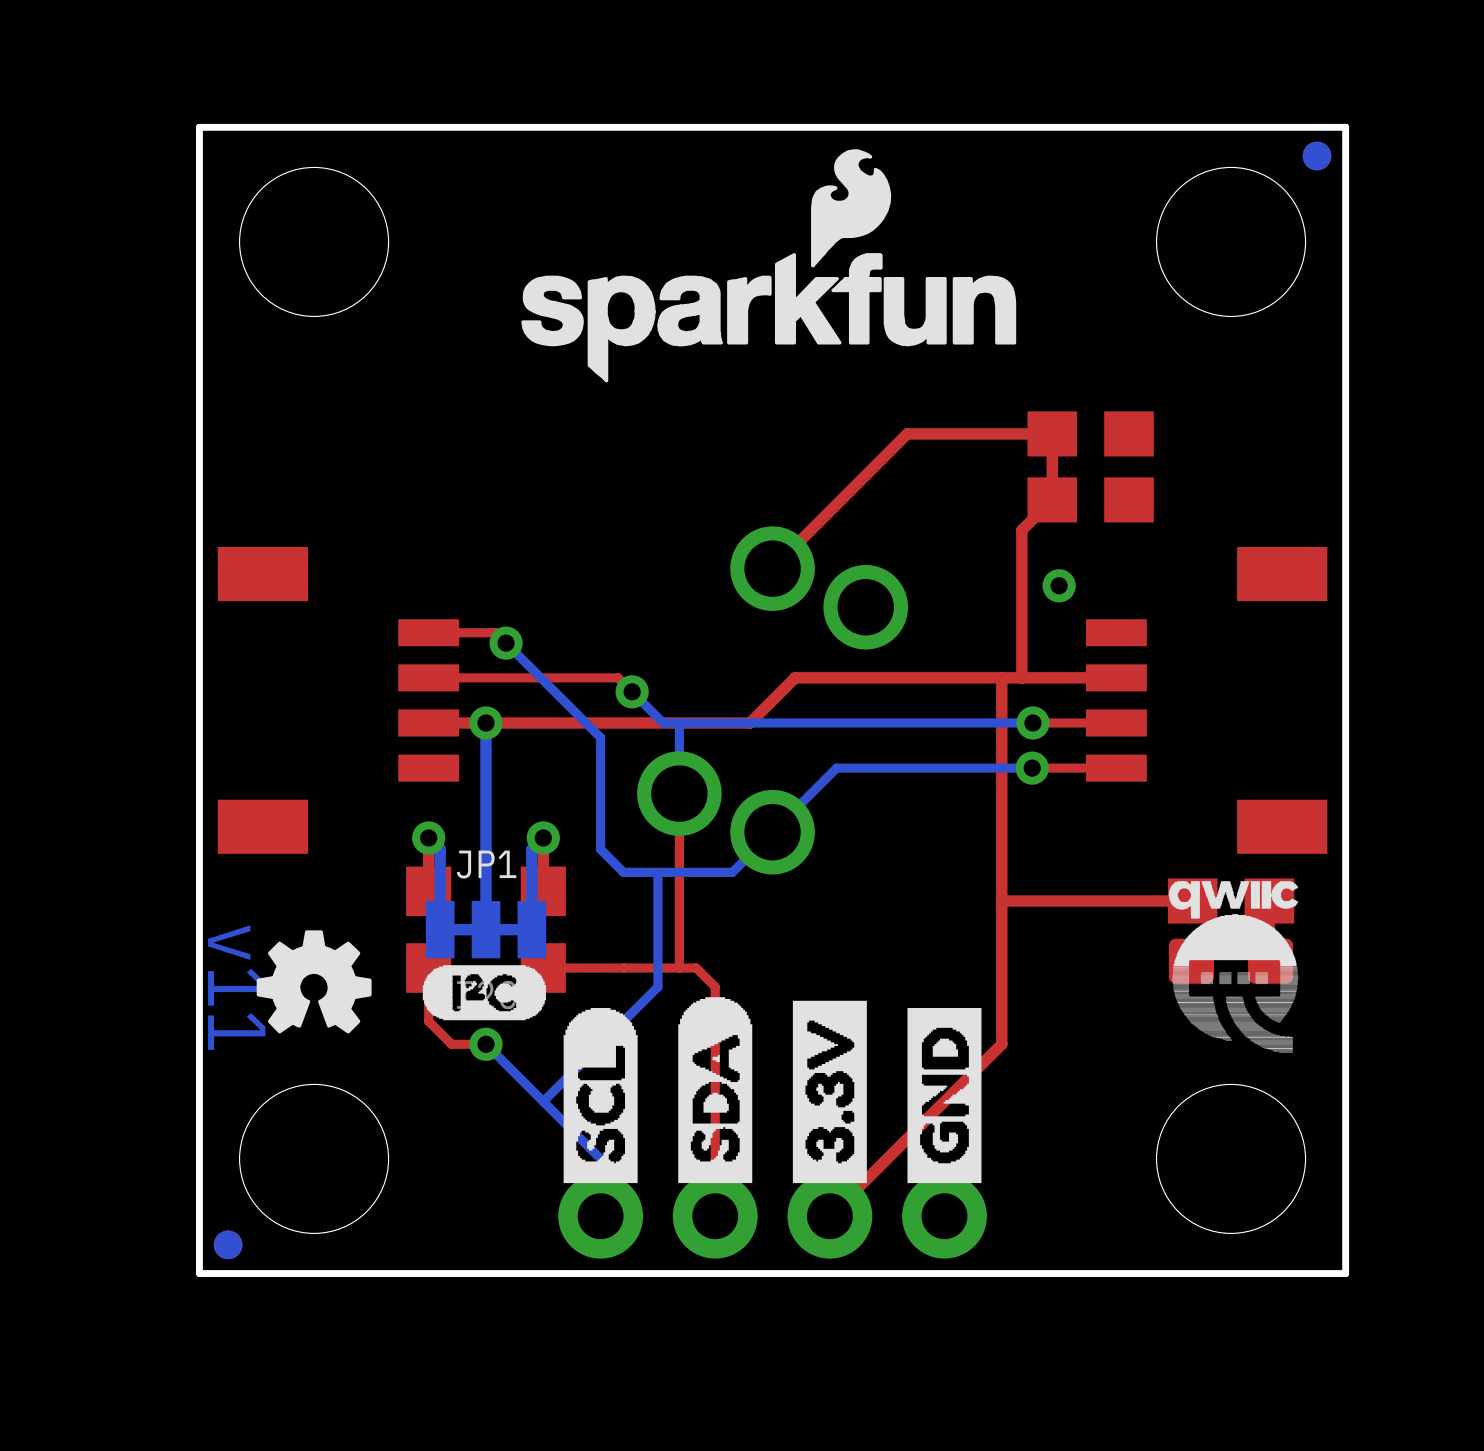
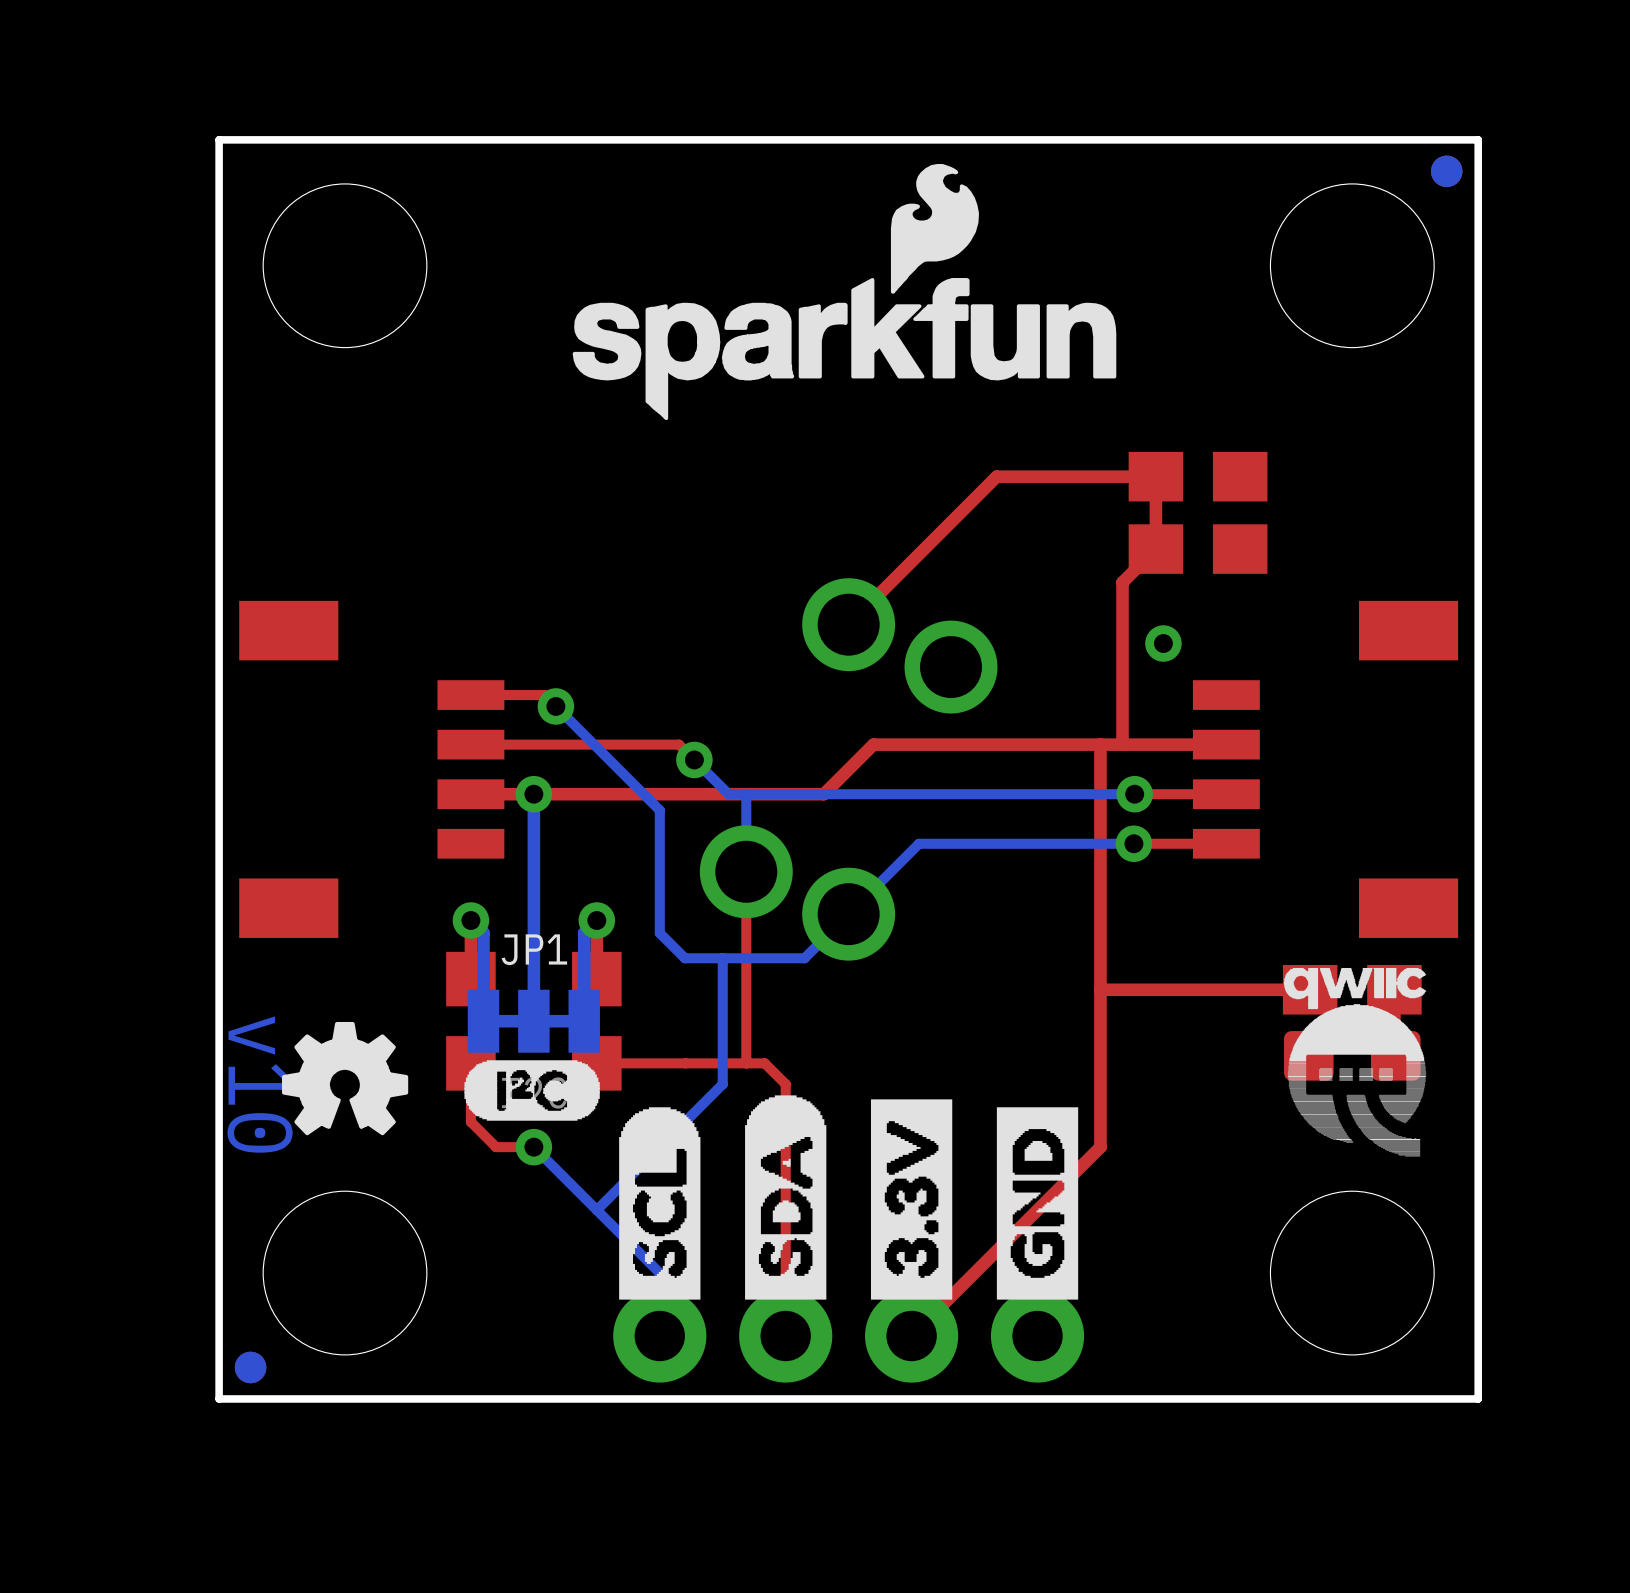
text: v11 (236, 987) -> v10 (260, 1084)

